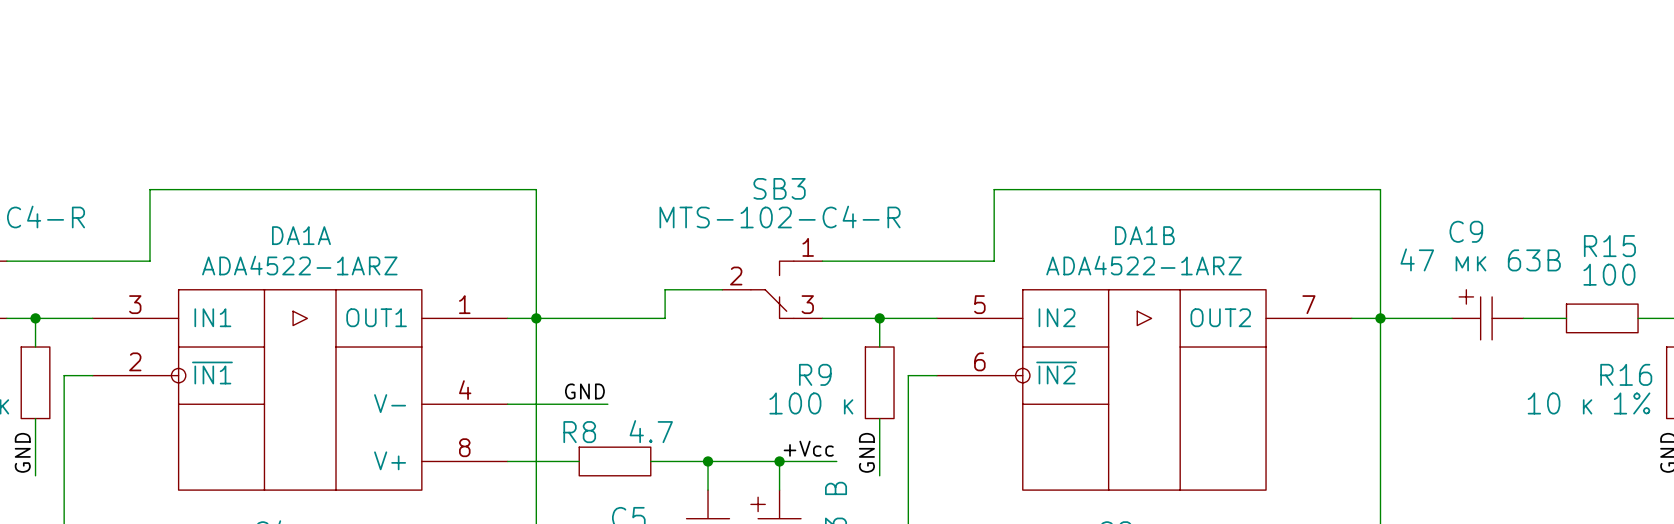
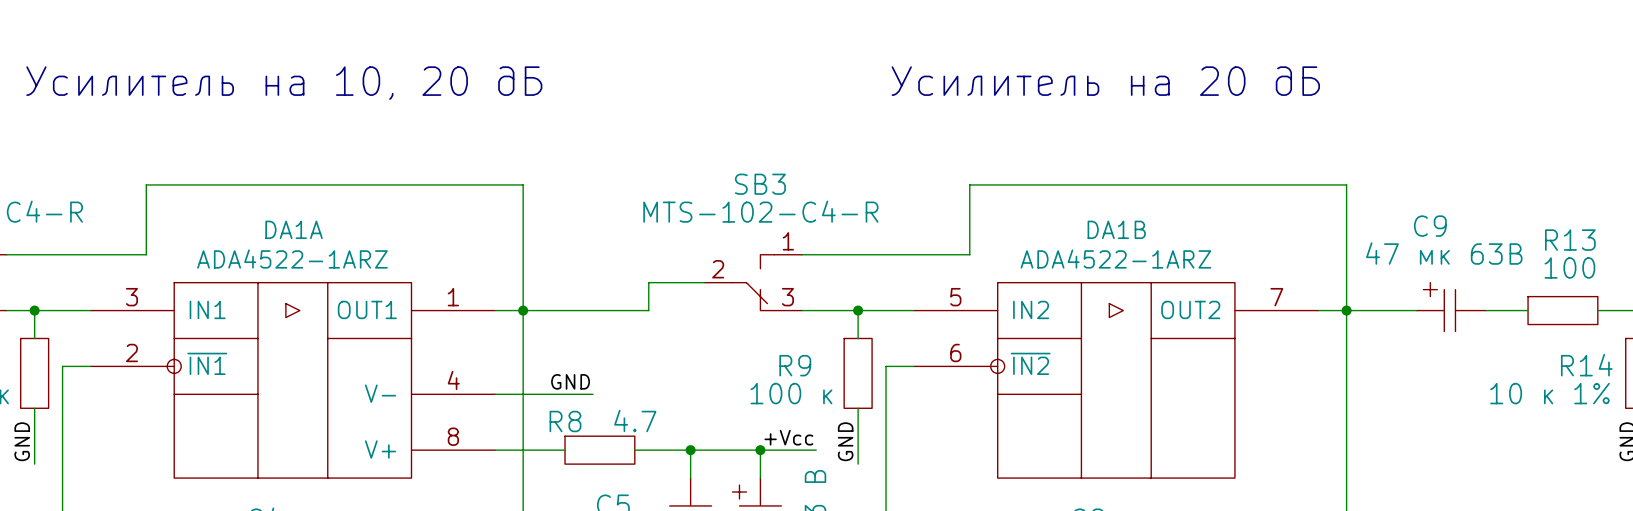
text: none -> Усилитель на 20 дБ (1105, 81)
text: none -> Усилитель на 10, 20 дБ (284, 83)
R15 name: R15 (1609, 246) -> R13 (1570, 240)
R16 name: R16 (1626, 374) -> R14 (1586, 365)

